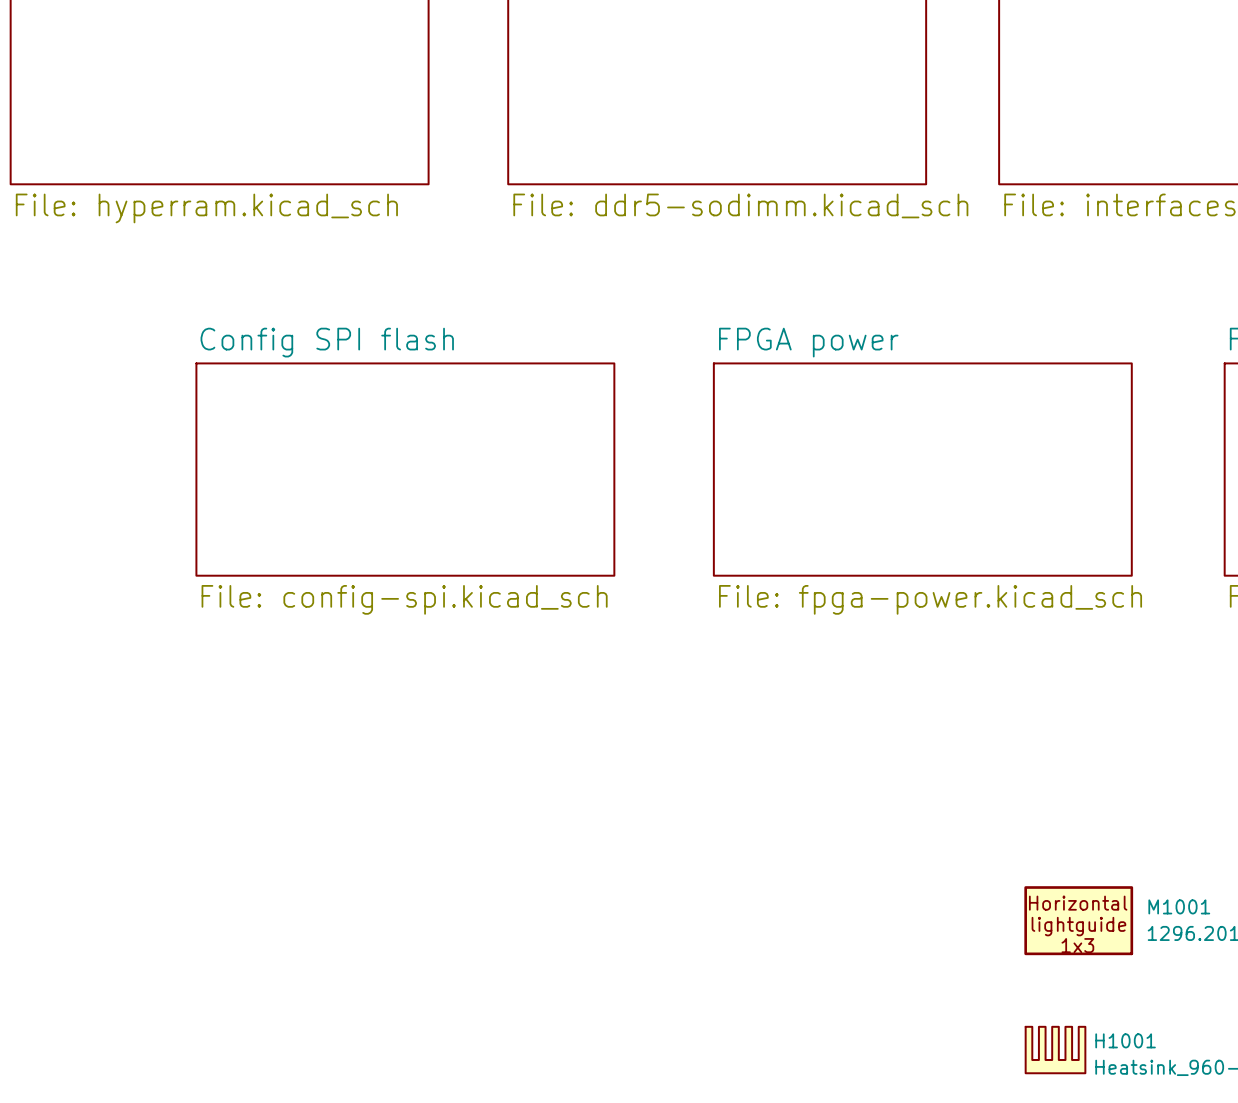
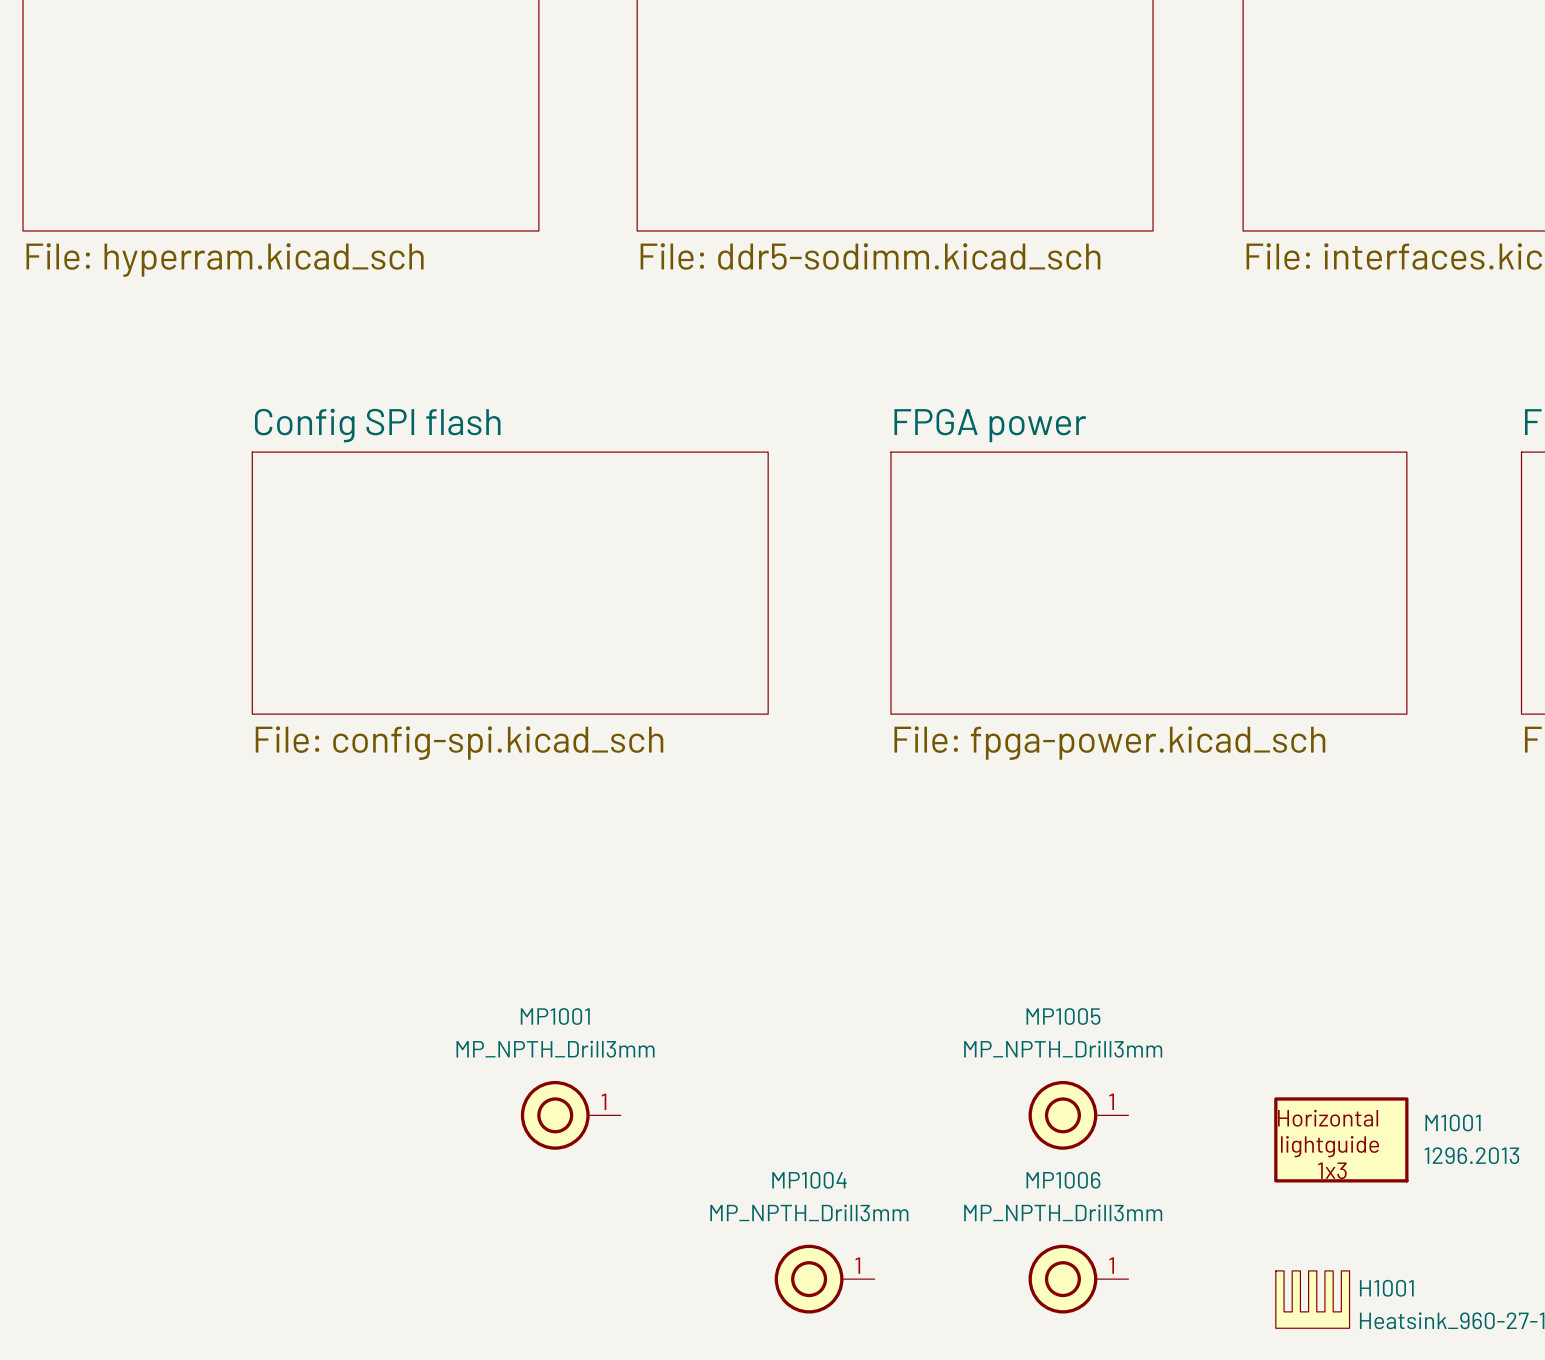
MP1001: none -> MP_NPTH_Drill3mm (570, 1115)
MP1005: none -> MP_NPTH_Drill3mm (1078, 1115)
MP1004: none -> MP_NPTH_Drill3mm (824, 1279)
MP1006: none -> MP_NPTH_Drill3mm (1078, 1279)

